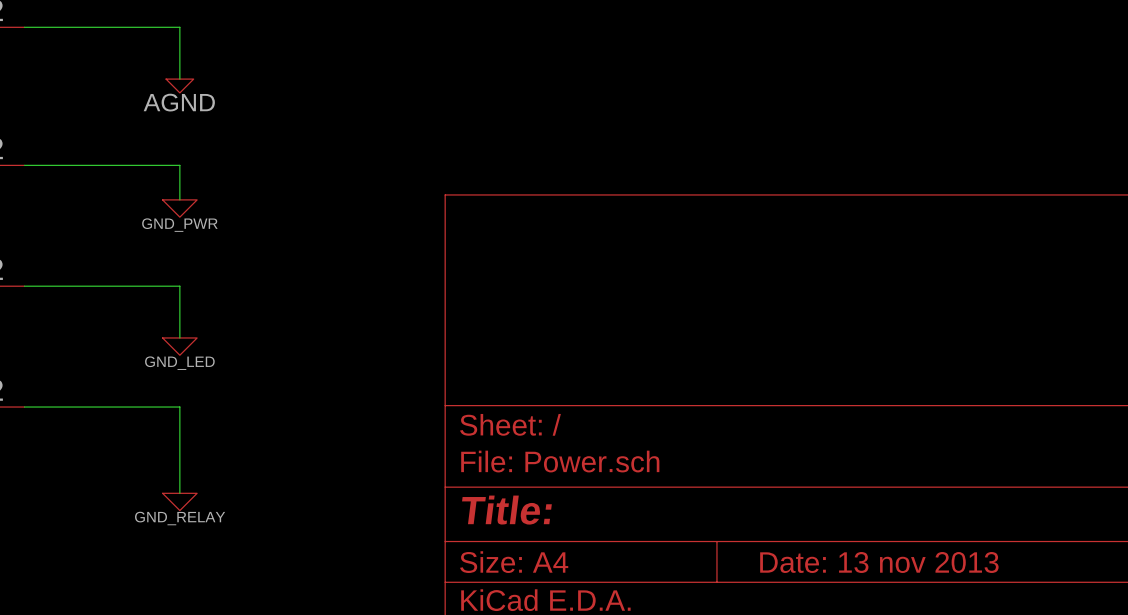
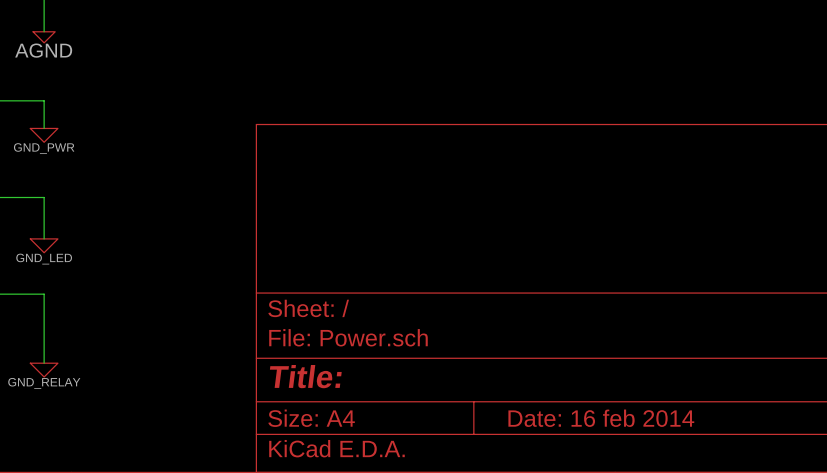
title block: Date: 13 nov 2013 (879, 562) -> Date: 16 feb 2014 (601, 418)

